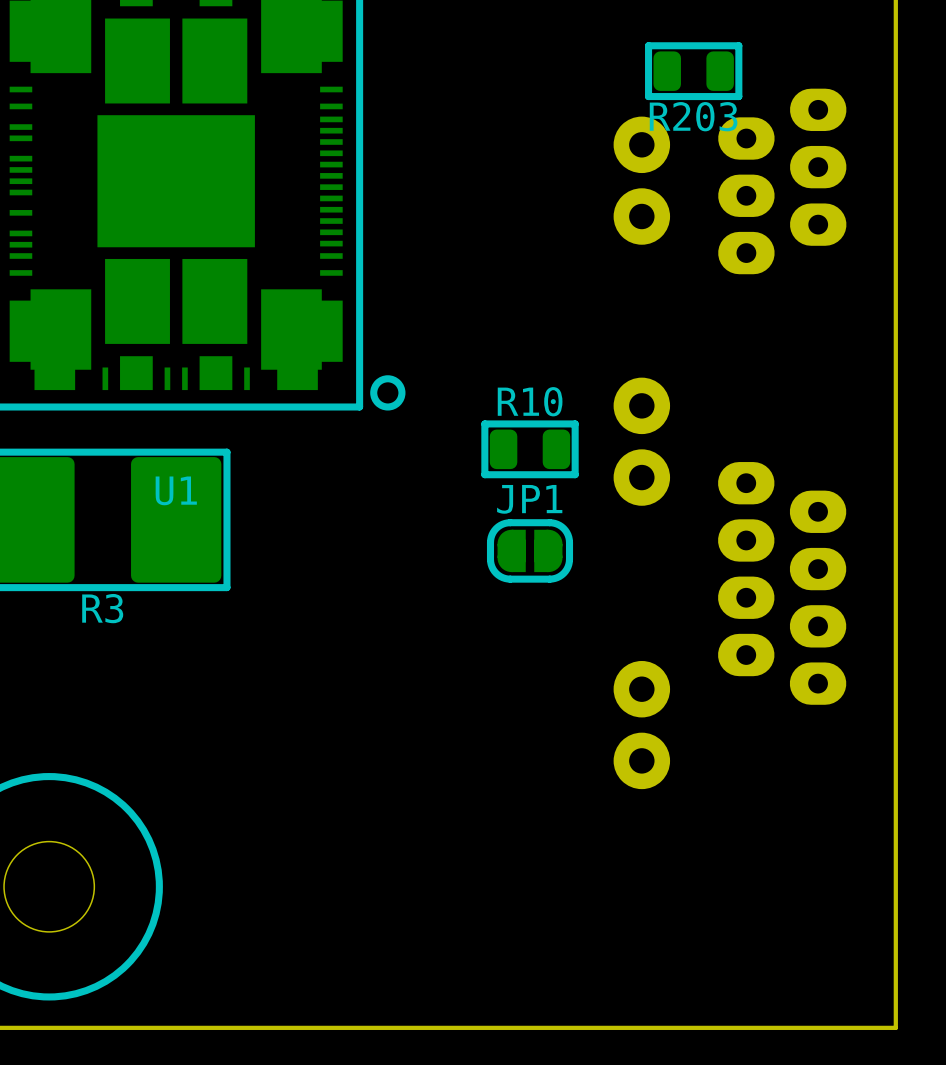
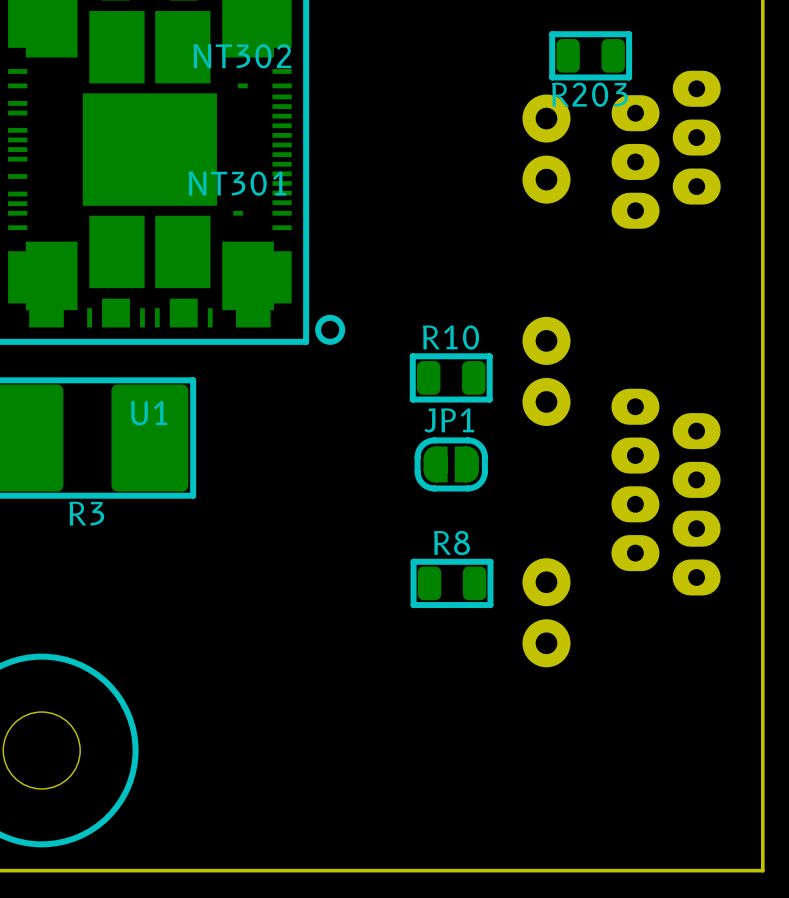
NT302: none -> (242, 85)
NT301: none -> (238, 213)
R8: none -> (452, 583)

